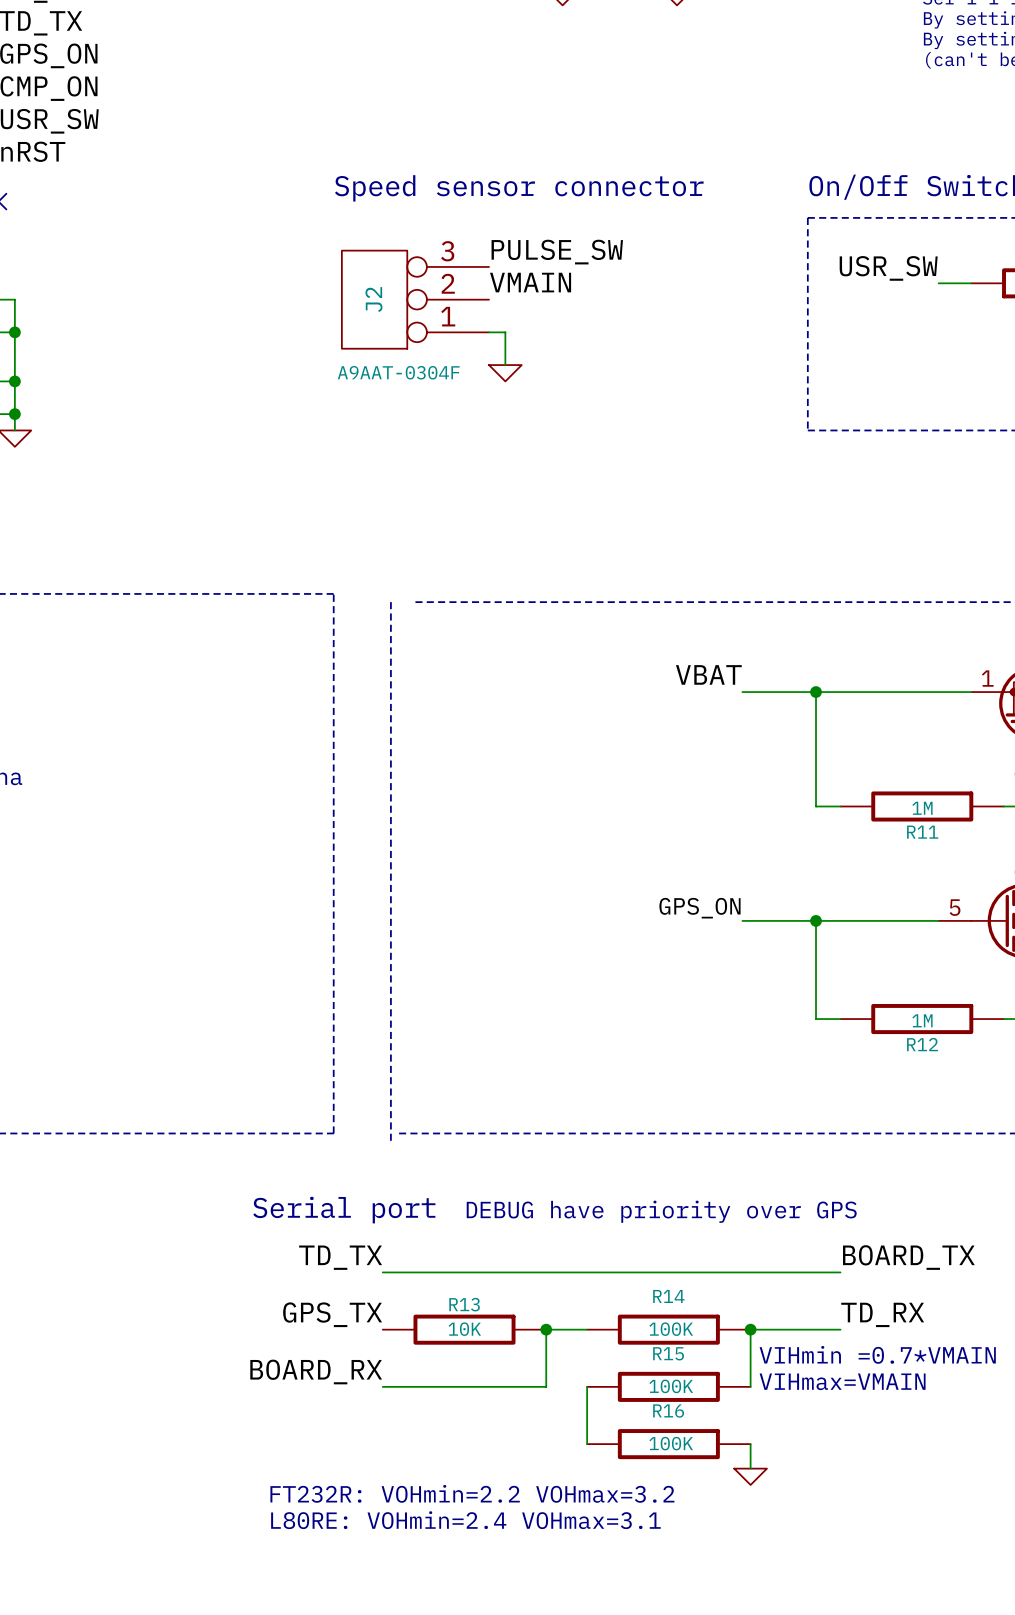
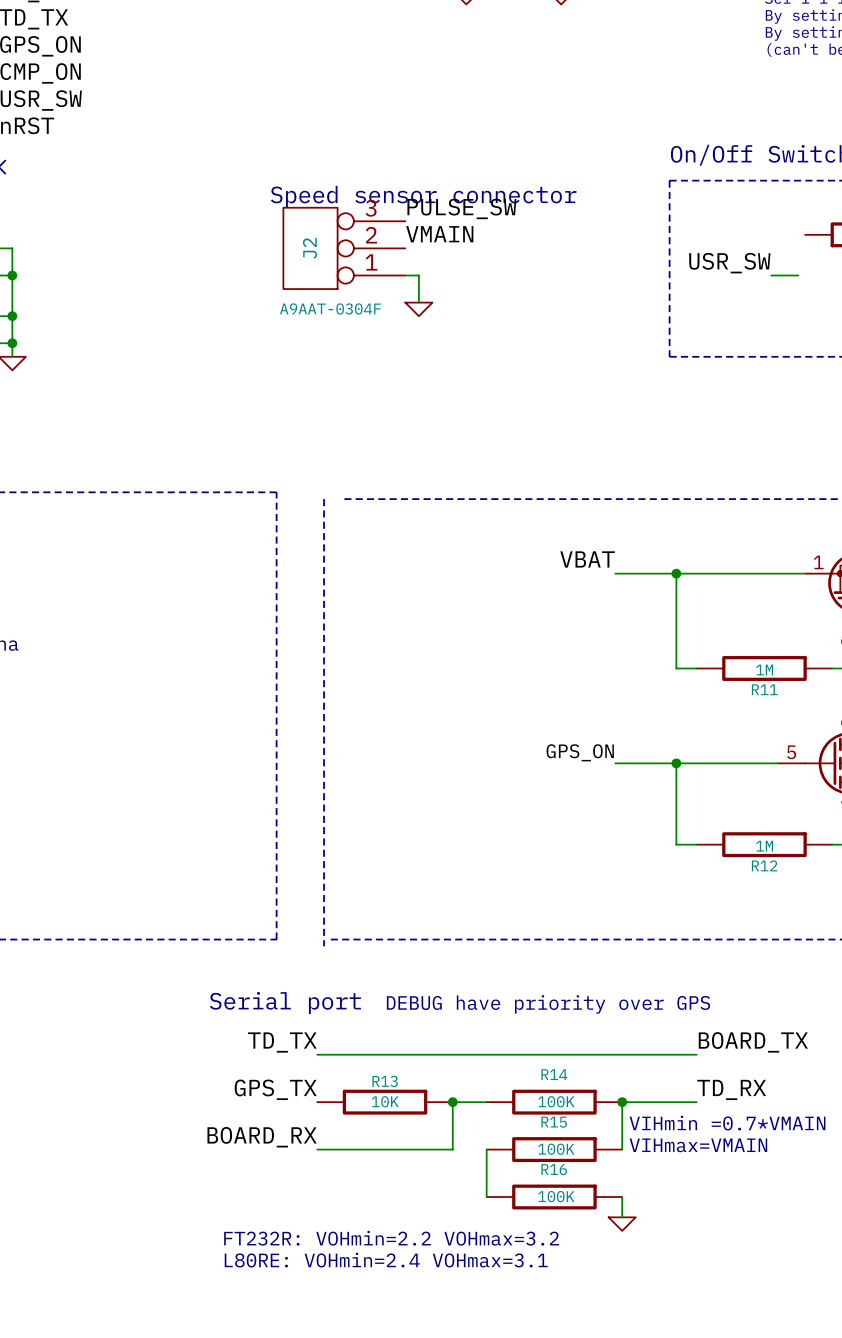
text position: Speed sensor connector (519, 188) -> Speed sensor connector (423, 196)
label position: USR_SW (888, 268) -> USR_SW (729, 263)
wire: (938, 283) (971, 283) -> (771, 275) (798, 275)

